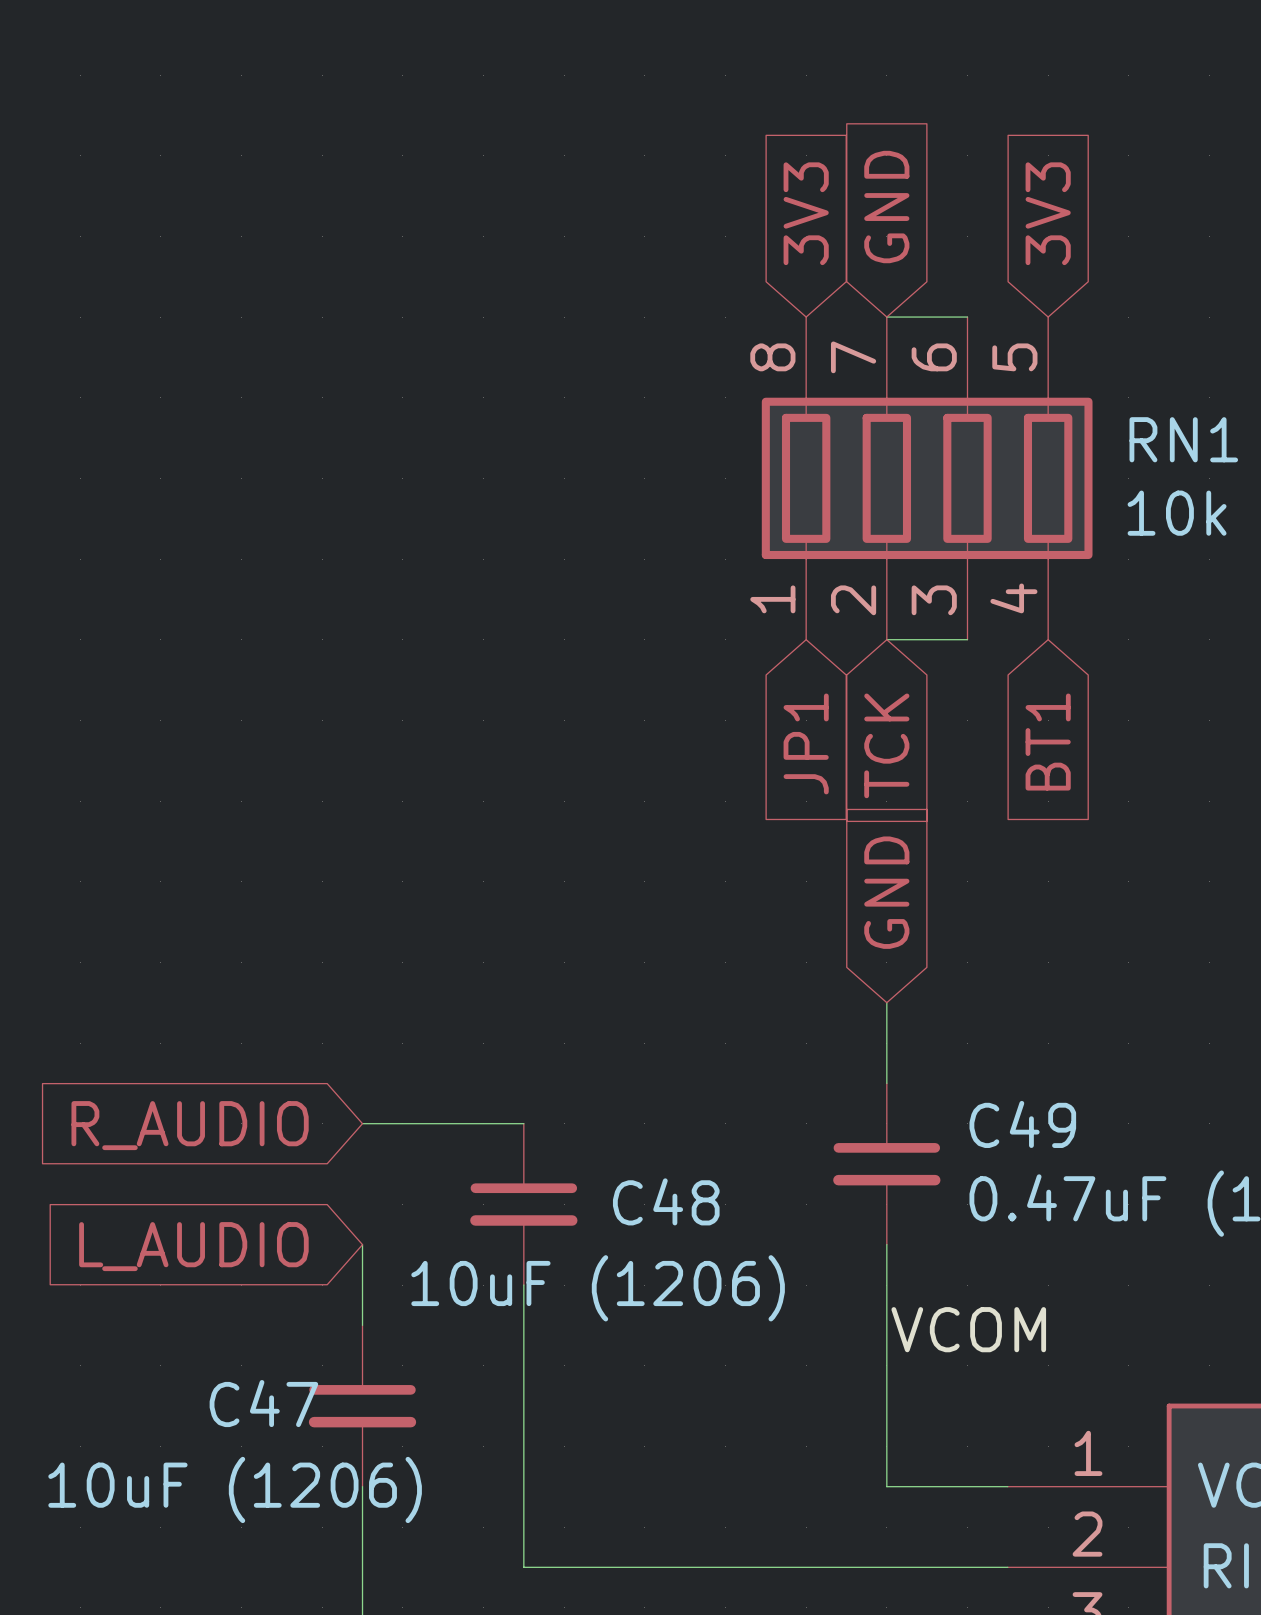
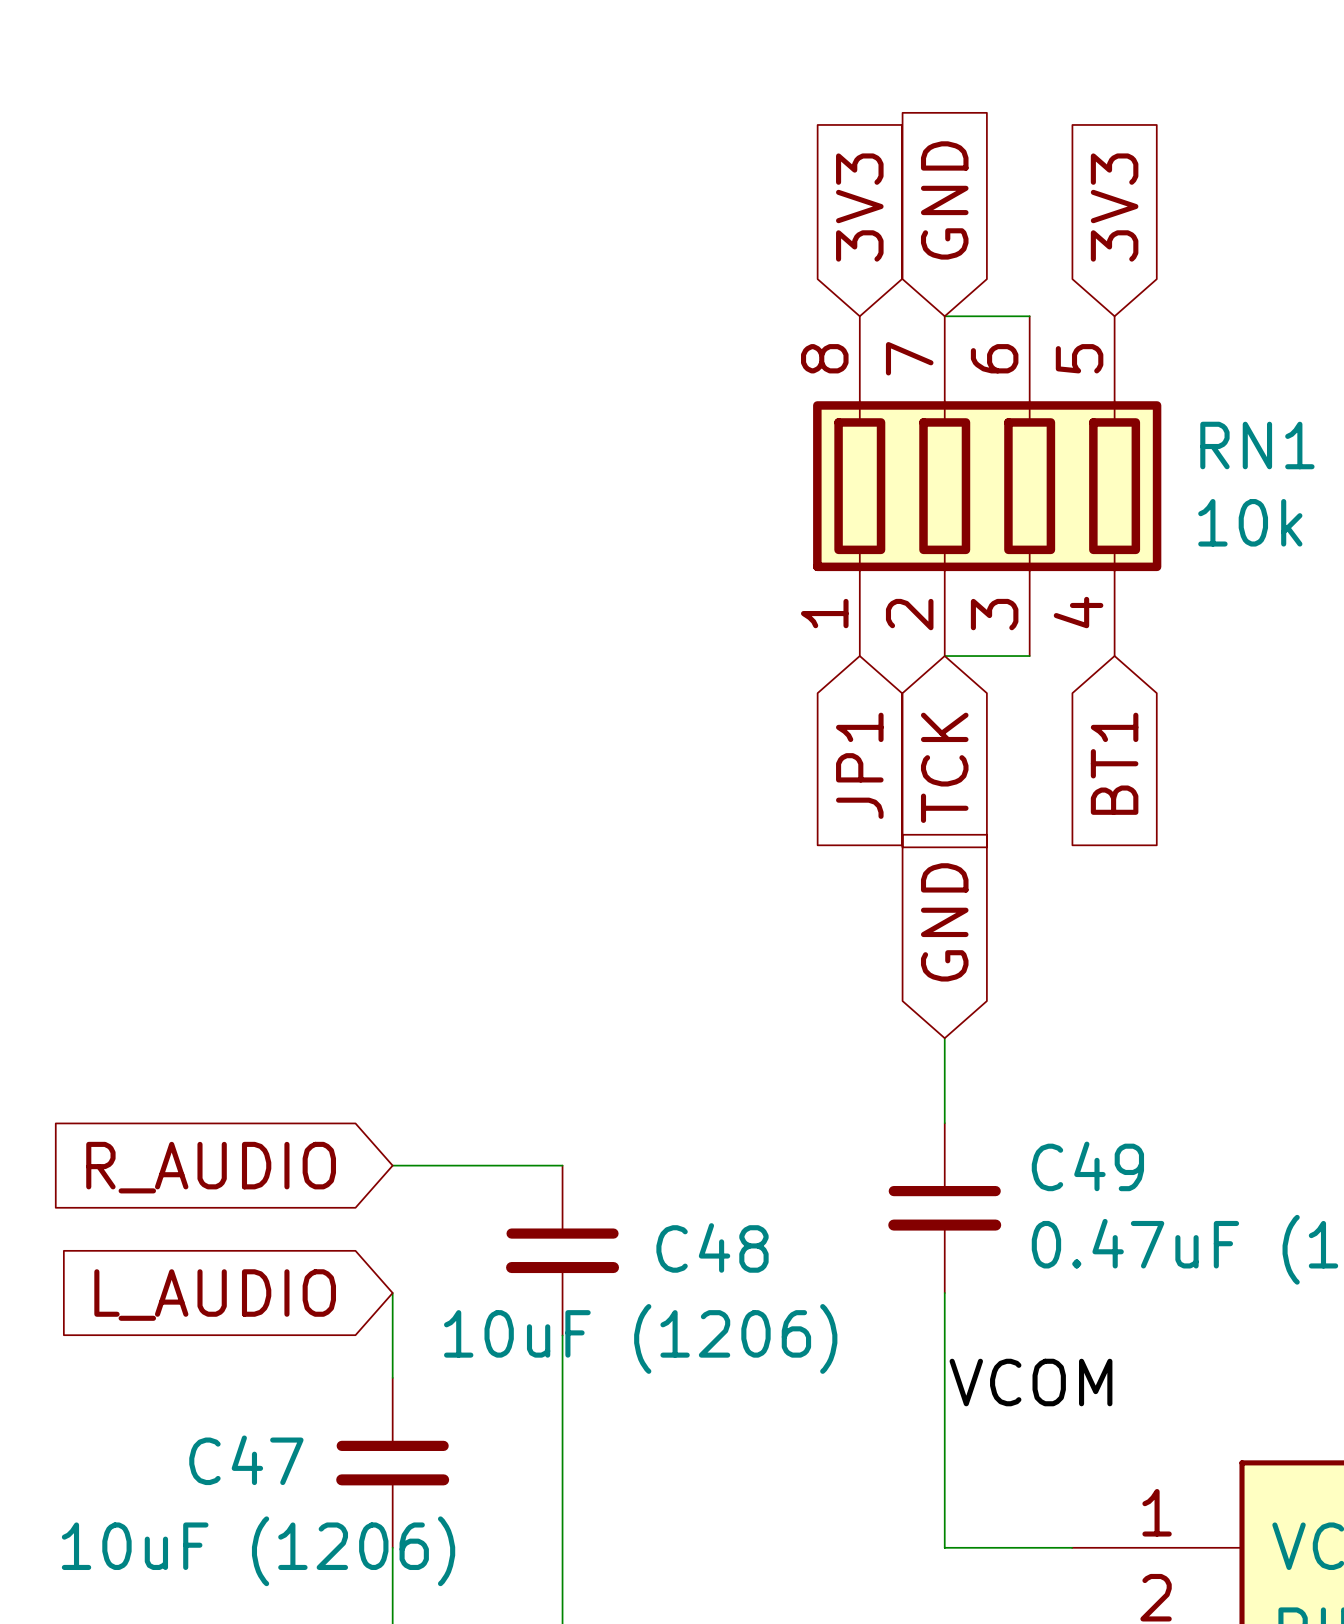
C47 name position: C47 (263, 1403) -> C47 (246, 1460)

